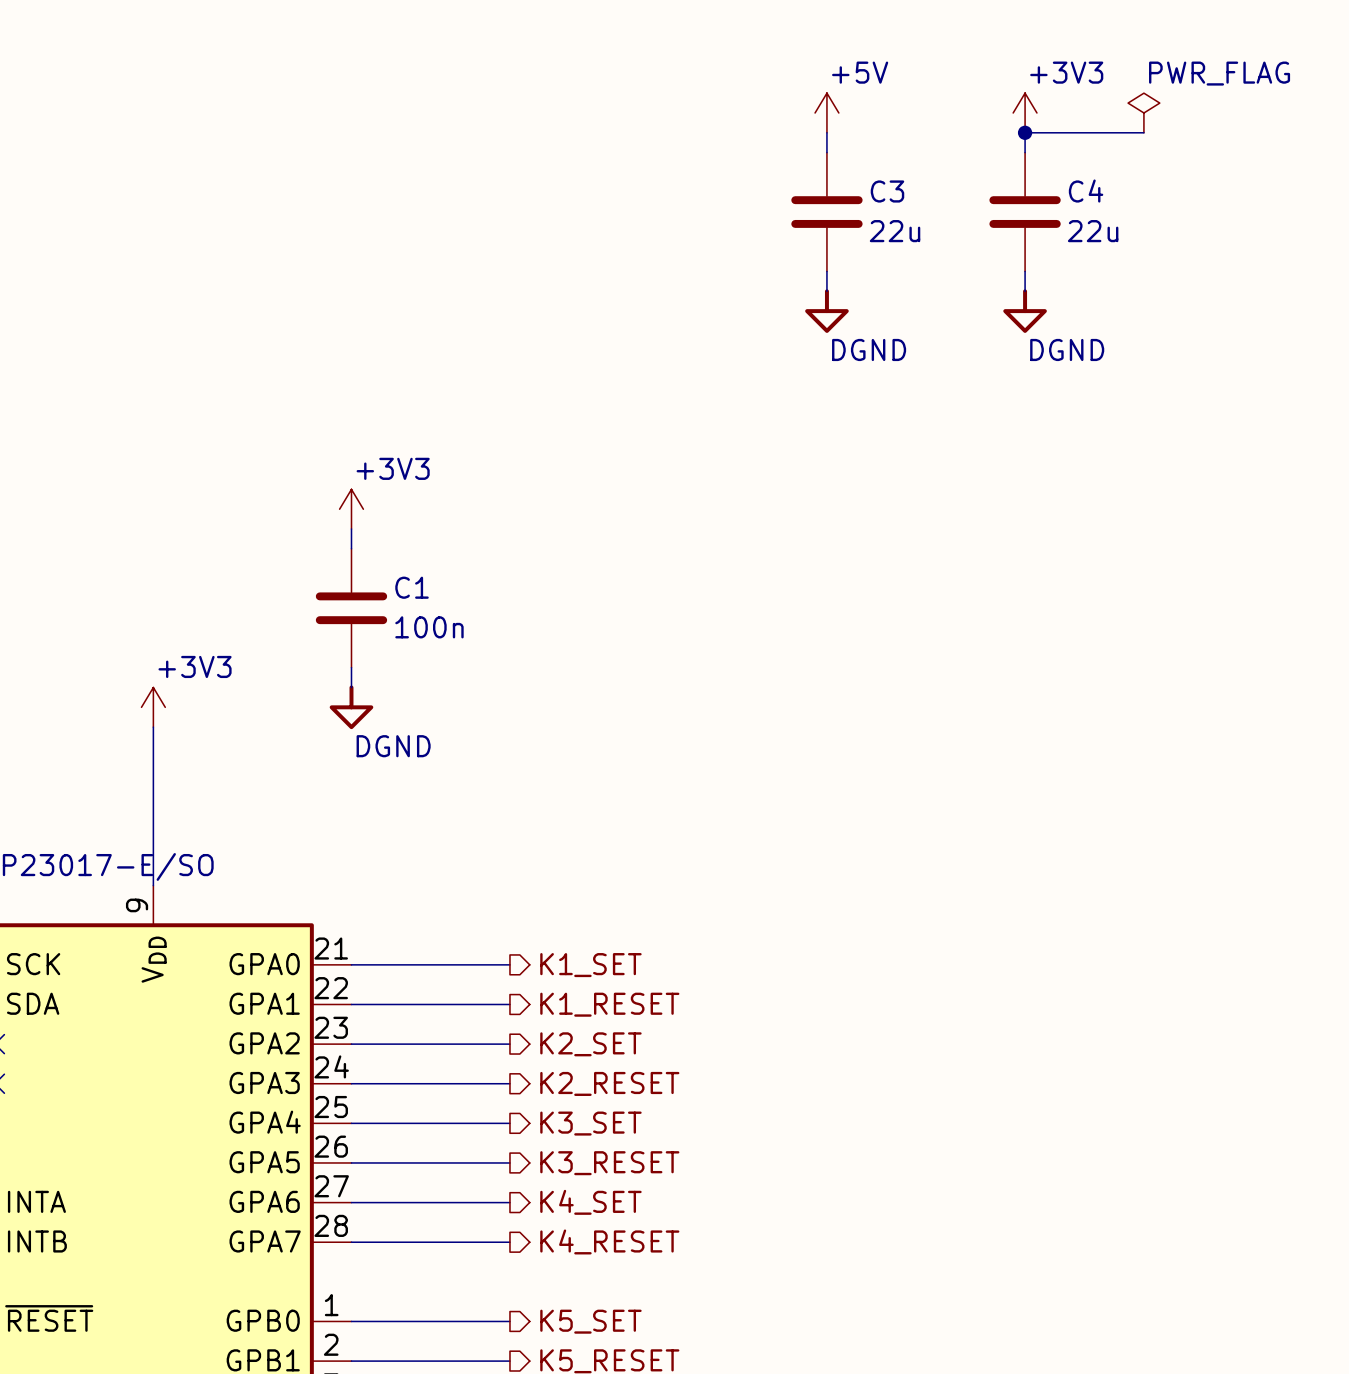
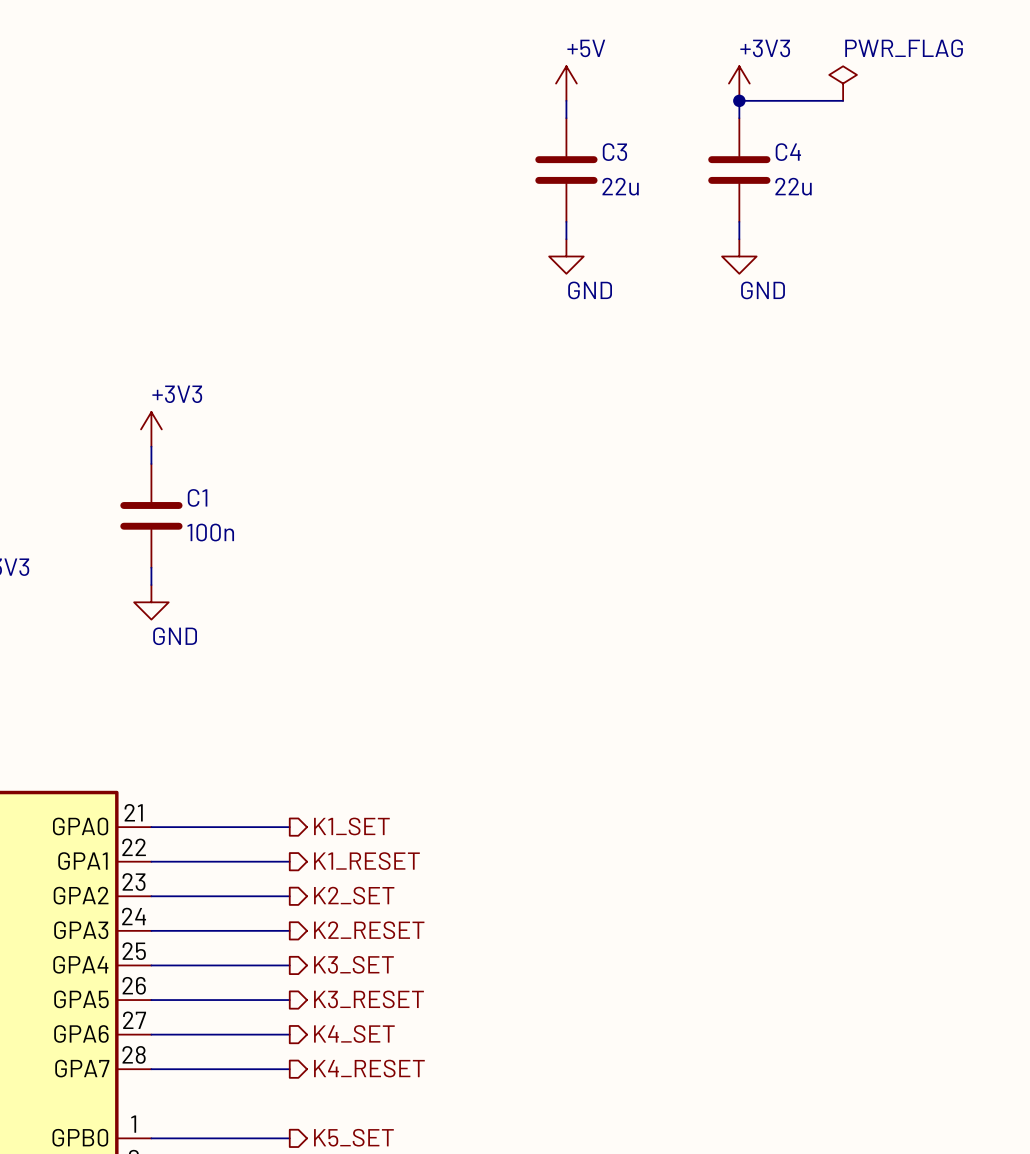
power symbol: DGND (826, 311) -> GND (566, 256)
power symbol: DGND (1025, 311) -> GND (739, 256)
power symbol: DGND (351, 707) -> GND (151, 602)

